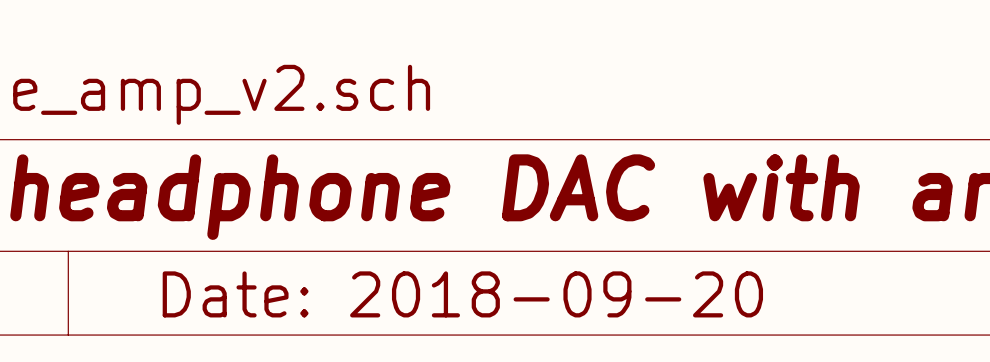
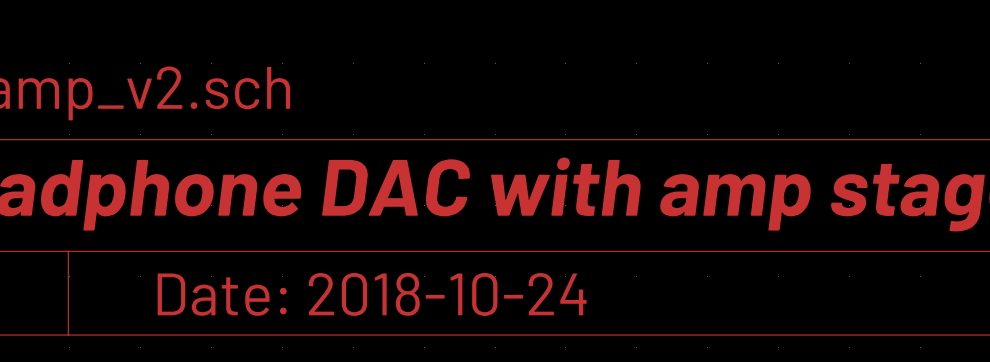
title block: Date: 2018-09-20 (462, 294) -> Date: 2018-10-24 (372, 294)

